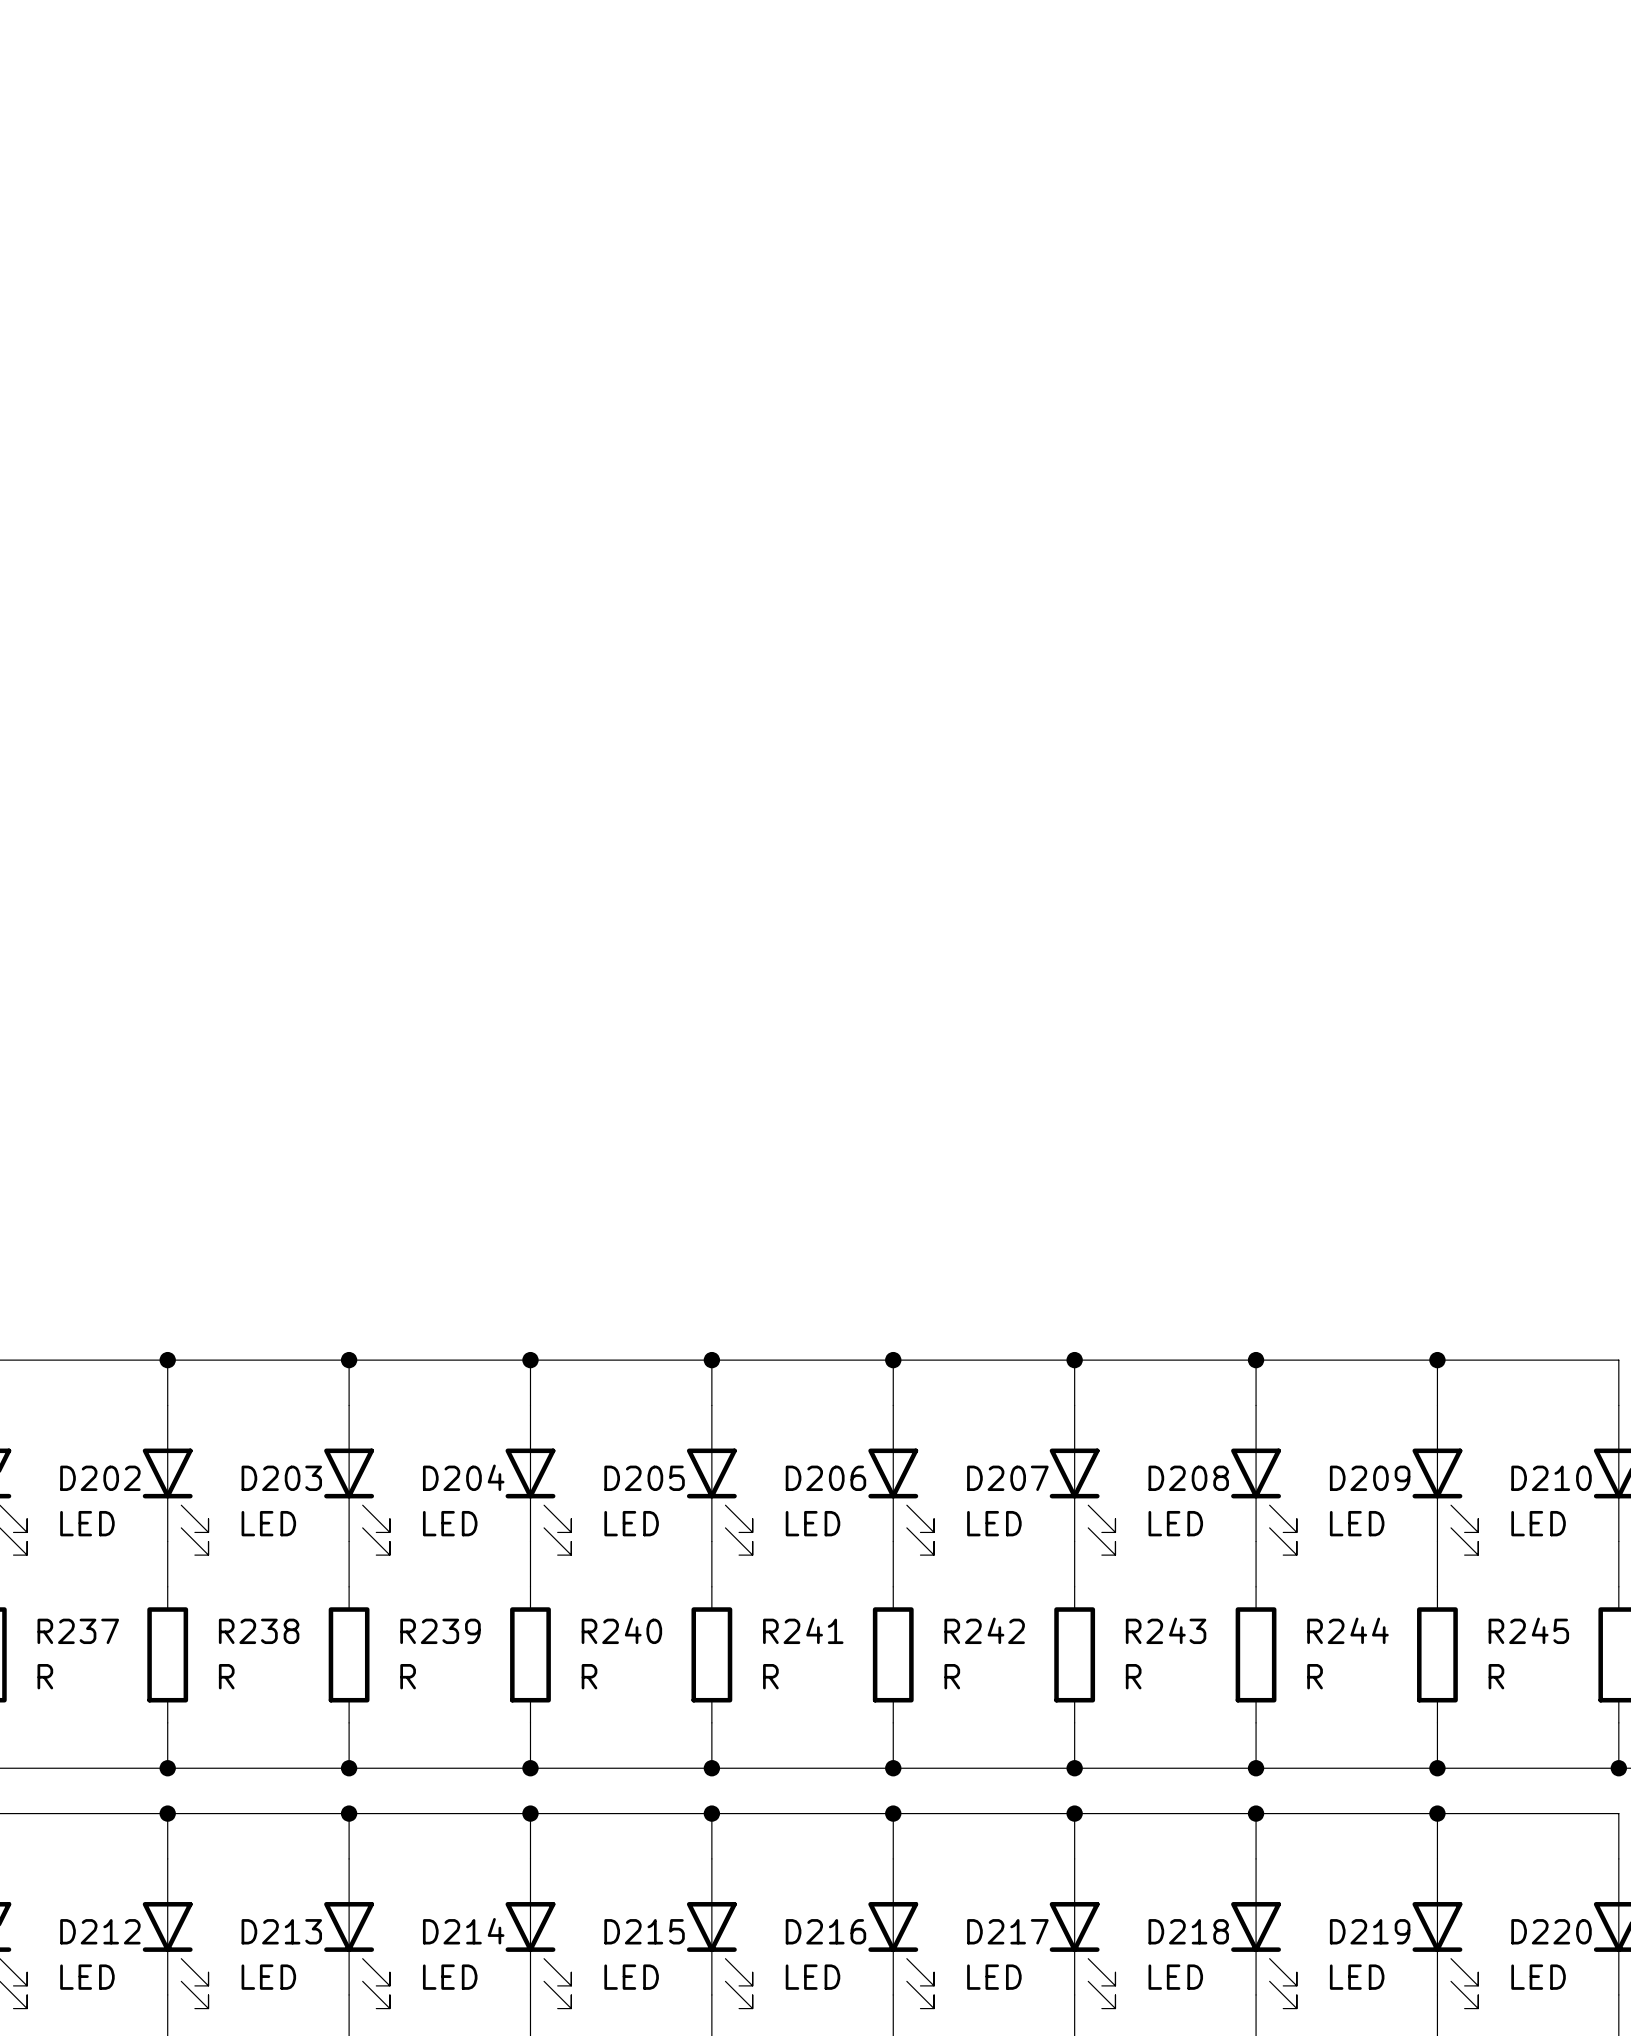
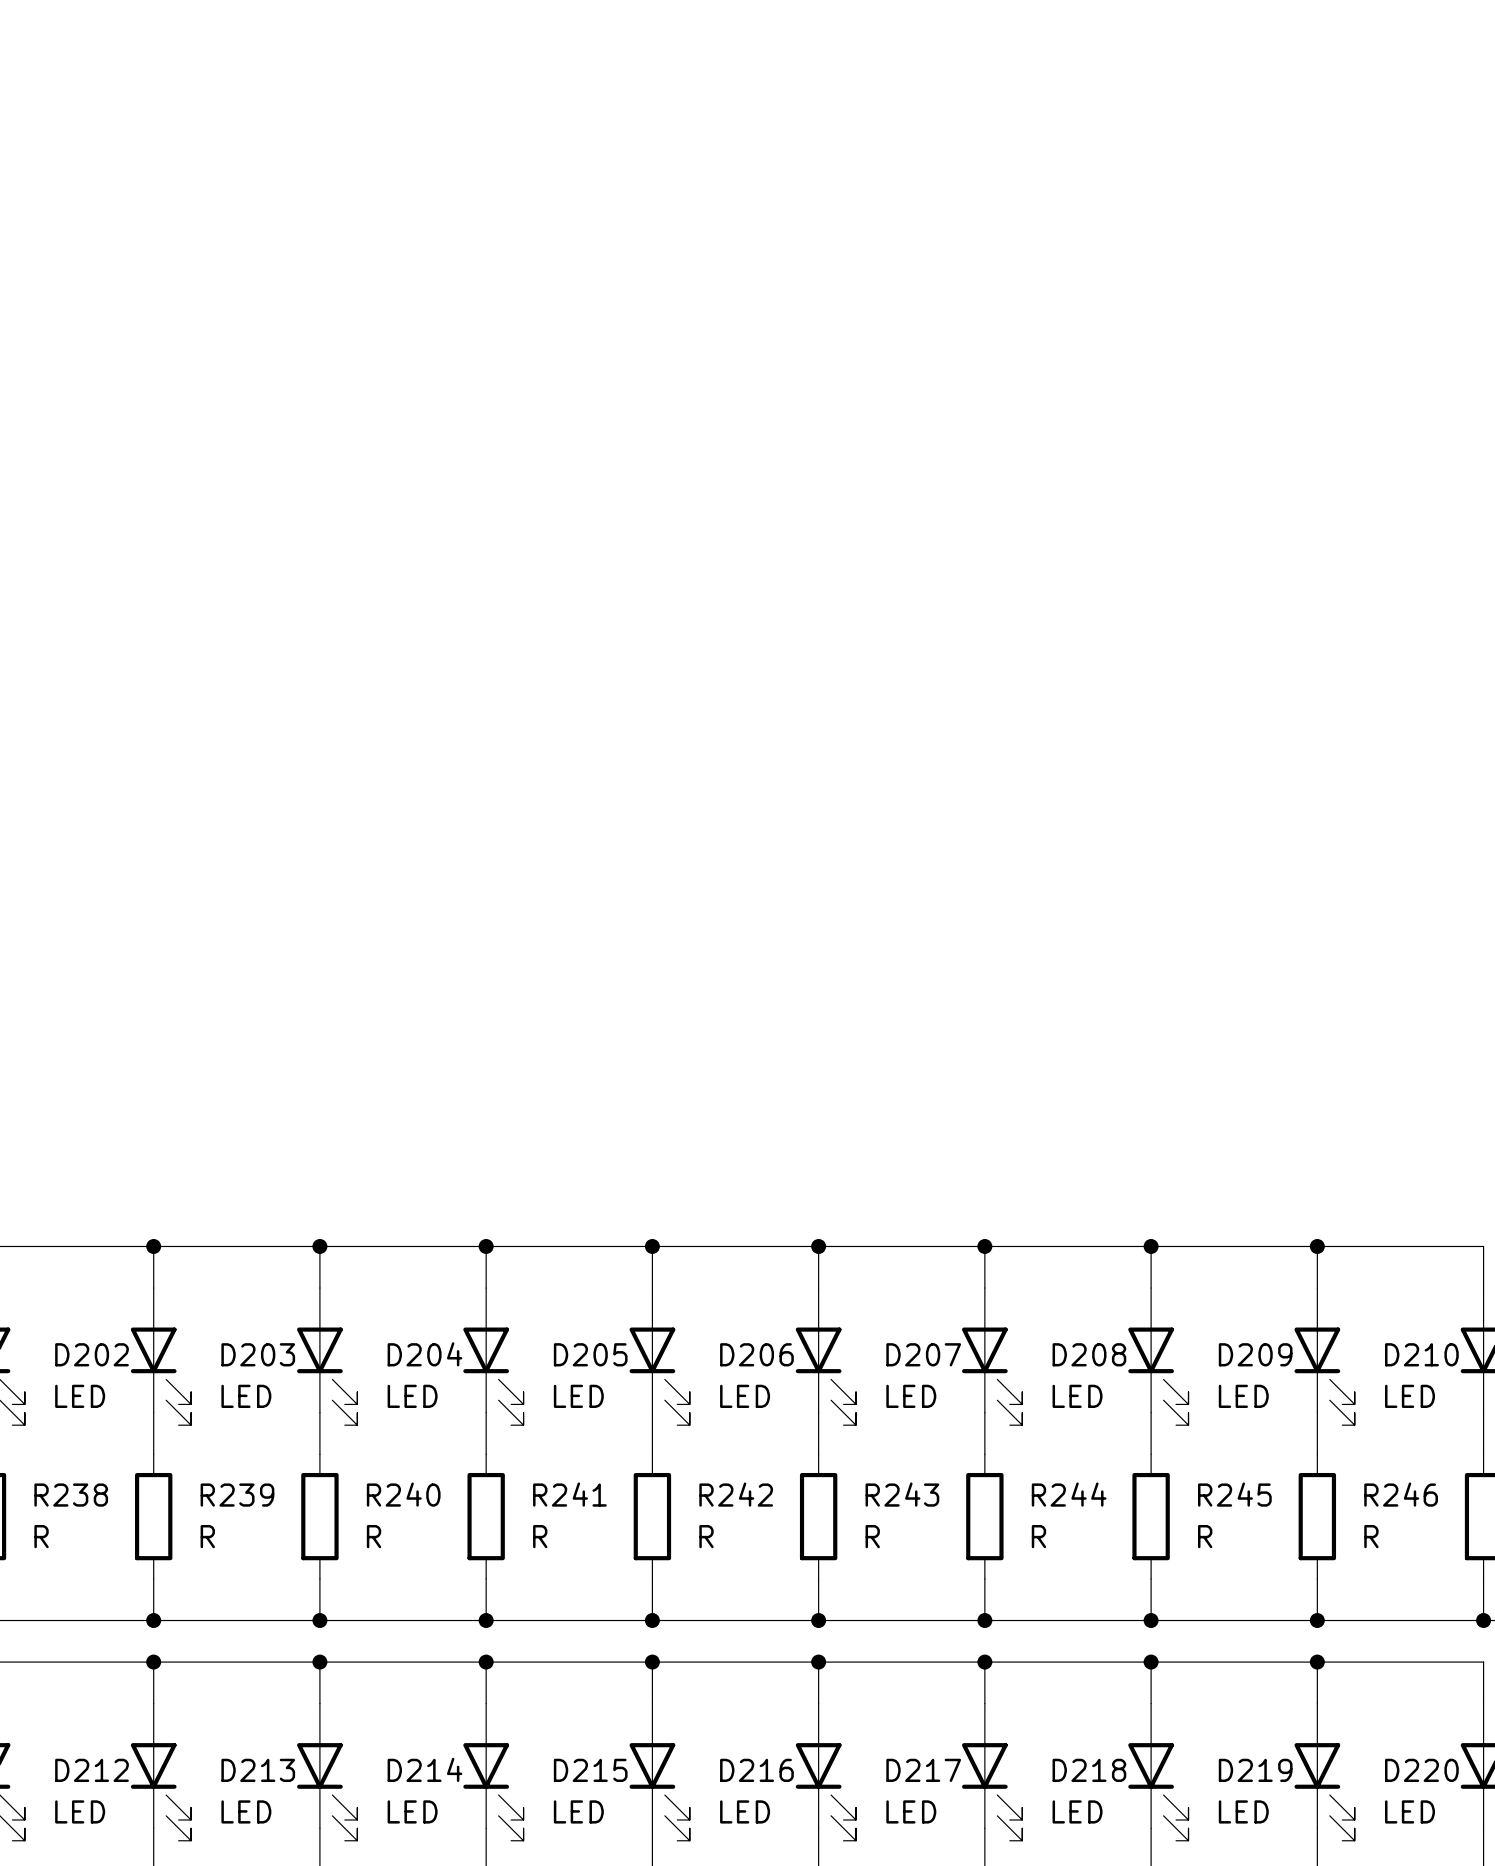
R240 name: R240 (621, 1630) -> R241 (569, 1494)
R241 name: R241 (803, 1630) -> R242 (736, 1494)
R242 name: R242 (984, 1630) -> R243 (902, 1494)
R243 name: R243 (1166, 1630) -> R244 (1069, 1494)
R244 name: R244 (1347, 1630) -> R245 (1234, 1494)
R245 name: R245 (1528, 1630) -> R246 (1401, 1494)
R237 name: R237 (78, 1631) -> R238 (71, 1495)
R238 name: R238 (259, 1631) -> R239 (237, 1495)
R239 name: R239 (440, 1631) -> R240 (403, 1494)

